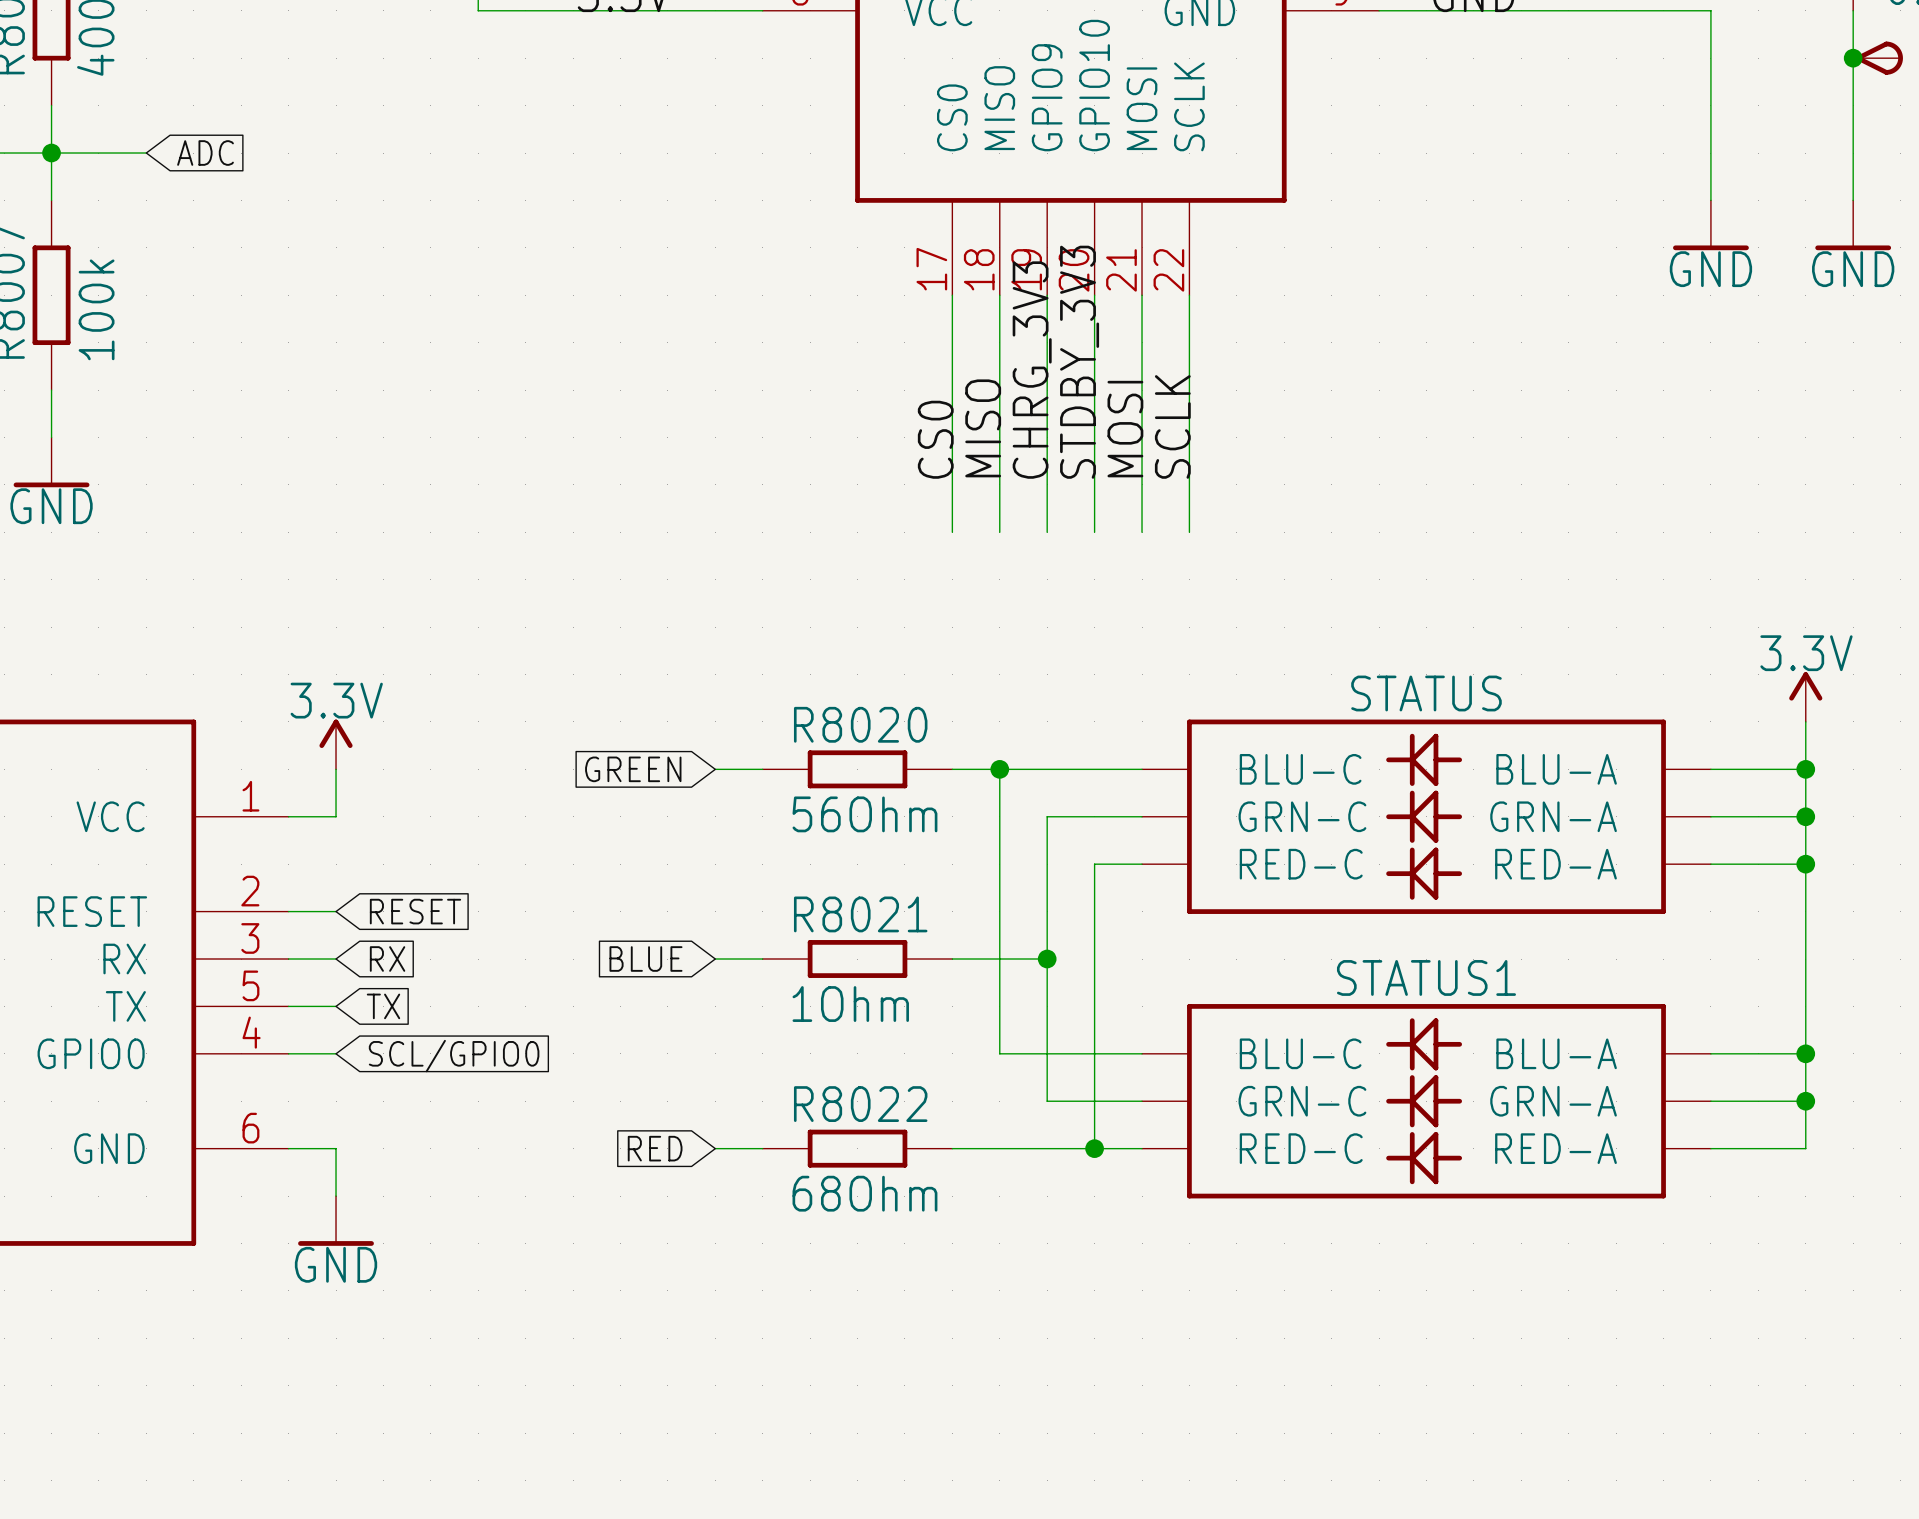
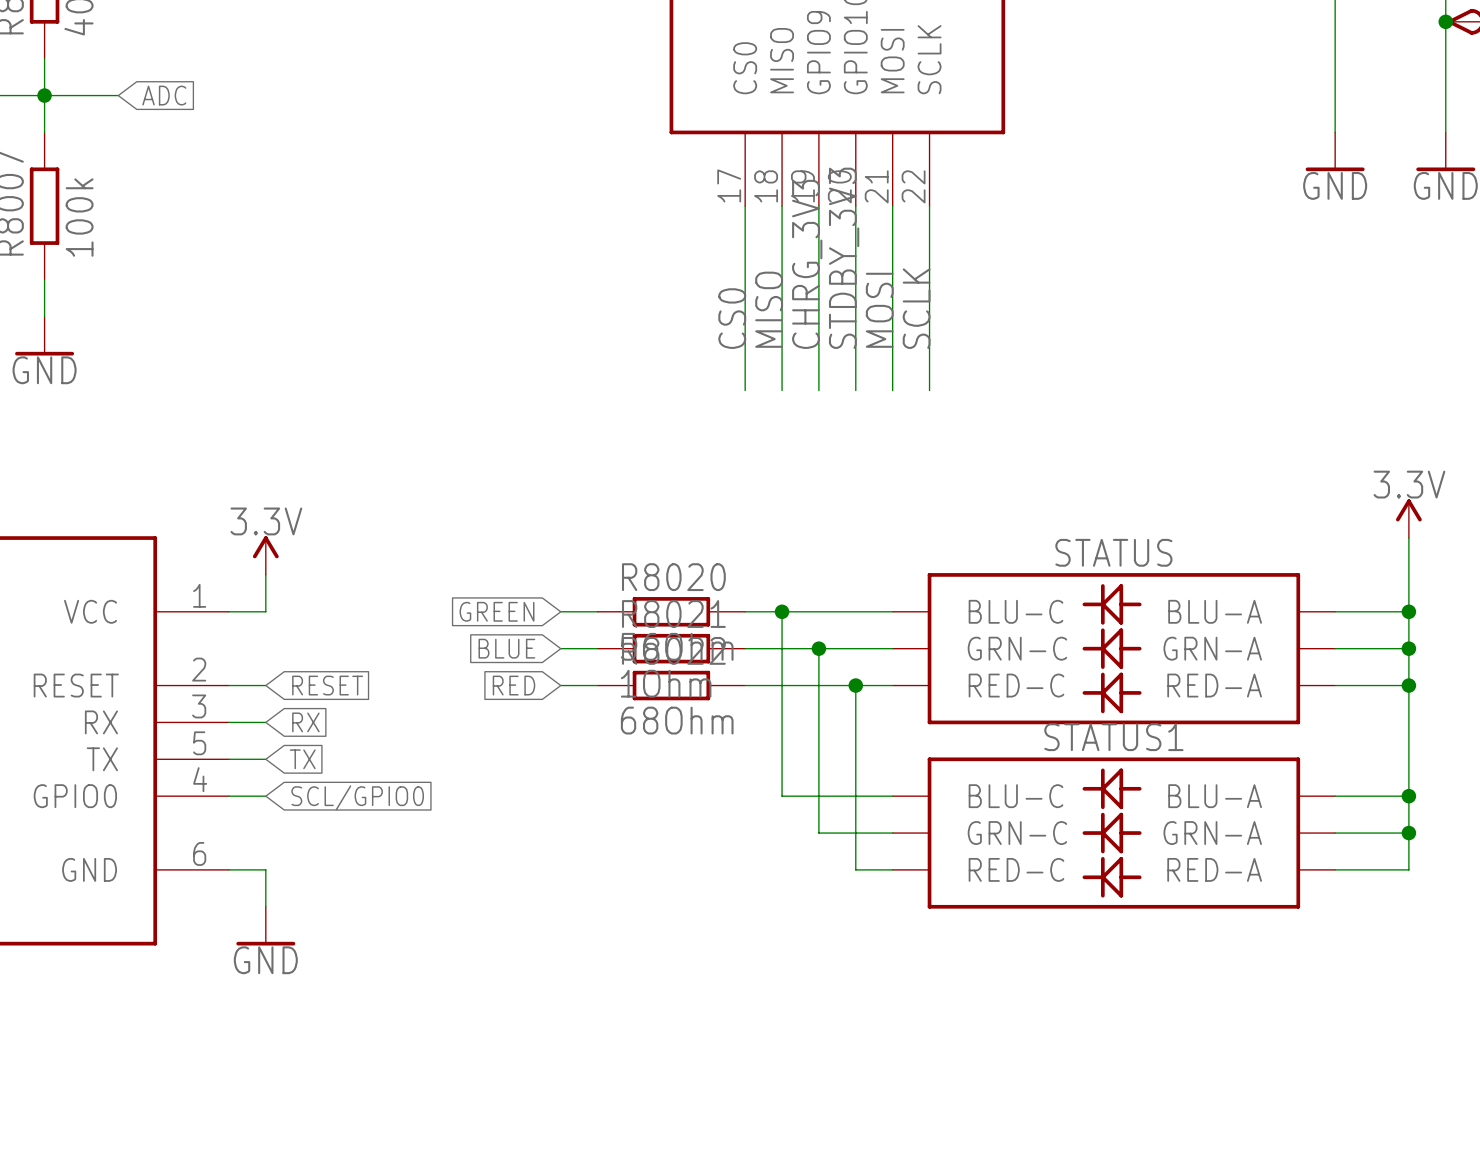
global label position: GREEN (633, 769) -> GREEN (497, 611)
wire: (715, 769) (762, 769) -> (560, 685) (597, 685)
R8020 position: (857, 769) -> (671, 611)
wire: (952, 769) (1142, 769) -> (745, 685) (892, 685)
wire: (999, 769) (999, 816) -> none
junction position: (999, 769) -> (782, 611)
wire: (1710, 769) (1805, 769) -> (1335, 685) (1408, 685)
junction: (1805, 769) -> none
wire: (1047, 816) (1047, 864) -> (818, 611) (745, 611)
STATUS position: (1426, 816) -> (1113, 648)
junction: none -> (818, 648)
wire: (1094, 864) (1094, 911) -> (855, 648) (745, 648)
junction: none -> (855, 685)
junction: none -> (1408, 685)
global label position: BLUE (645, 959) -> BLUE (506, 648)
wire: (715, 959) (762, 959) -> (560, 611) (597, 611)
R8021 position: (857, 959) -> (671, 648)
wire: (952, 959) (1047, 959) -> none
junction: (1047, 959) -> none
global label position: RED (655, 1148) -> RED (514, 685)
wire: (715, 1148) (762, 1148) -> (560, 648) (597, 648)
R8022 position: (857, 1148) -> (671, 685)
wire: (952, 1148) (1094, 1148) -> none
junction: (1094, 1148) -> none

